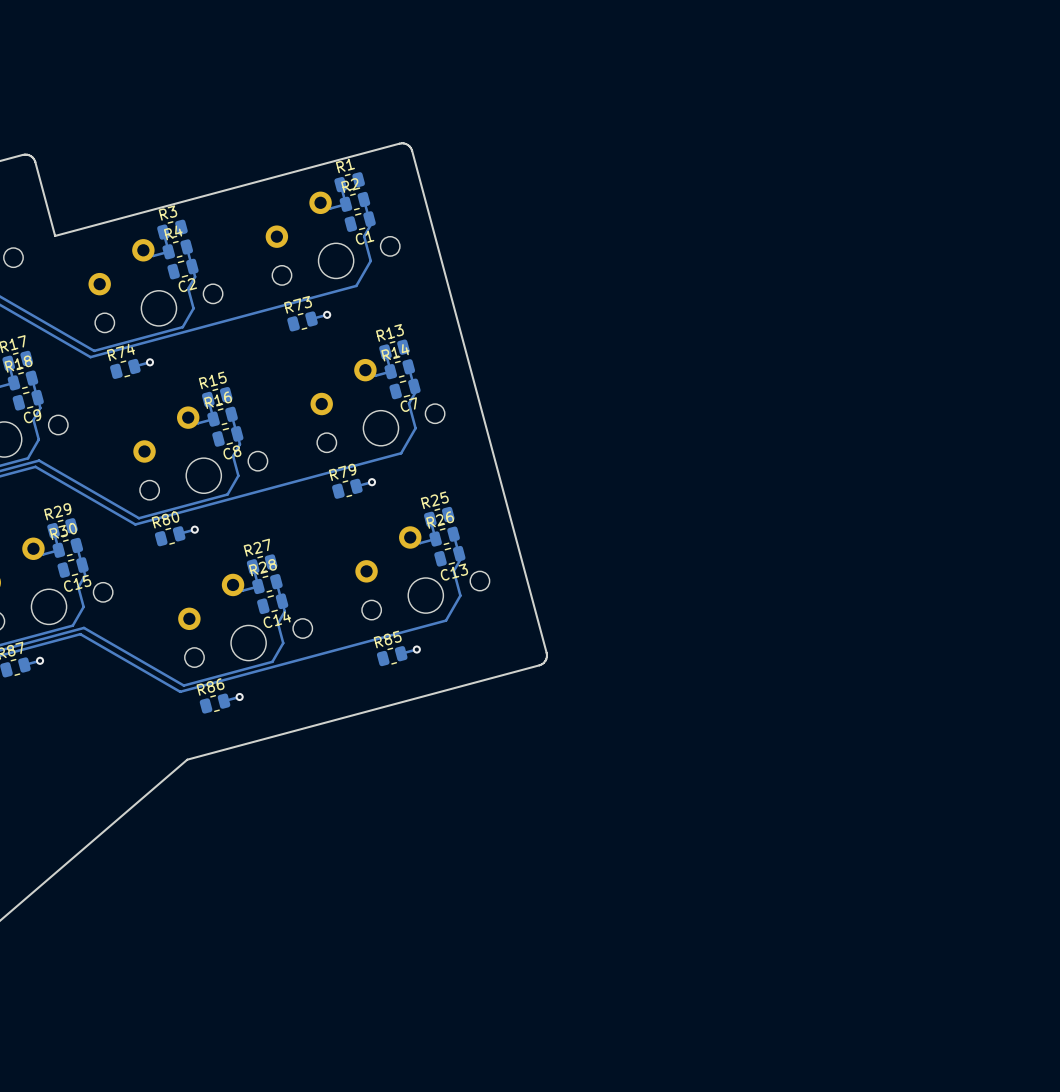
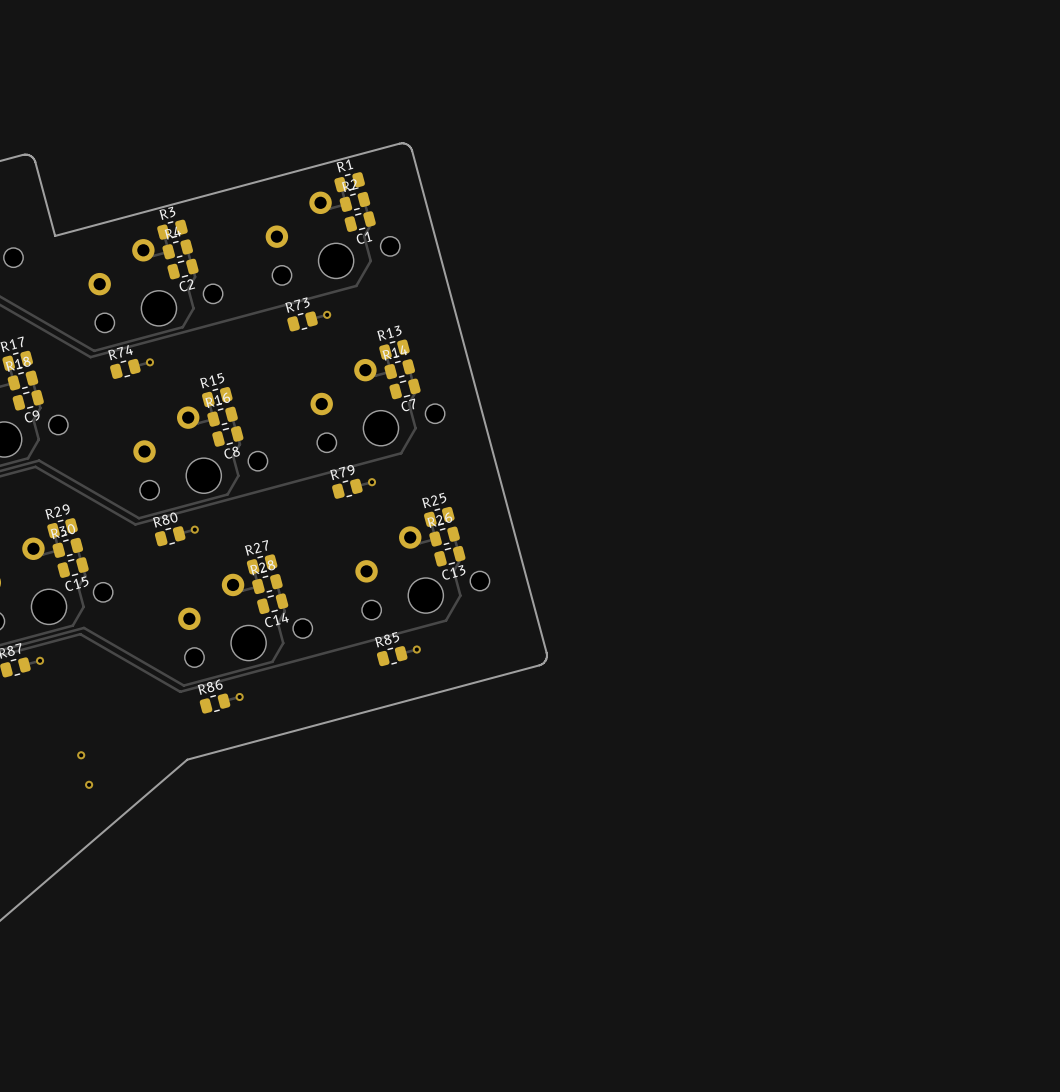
via: none -> (81, 755)
via: none -> (89, 784)

